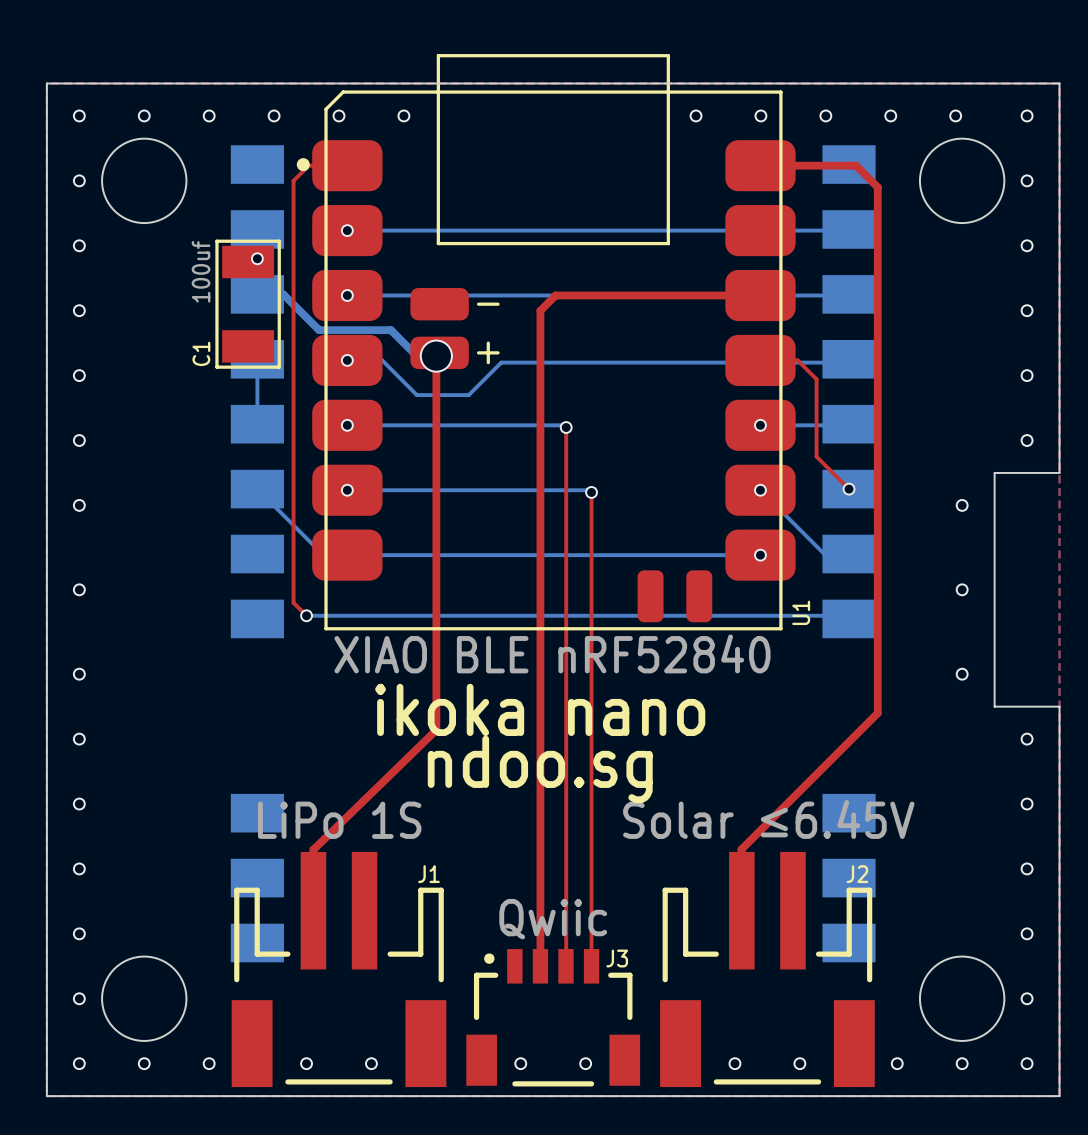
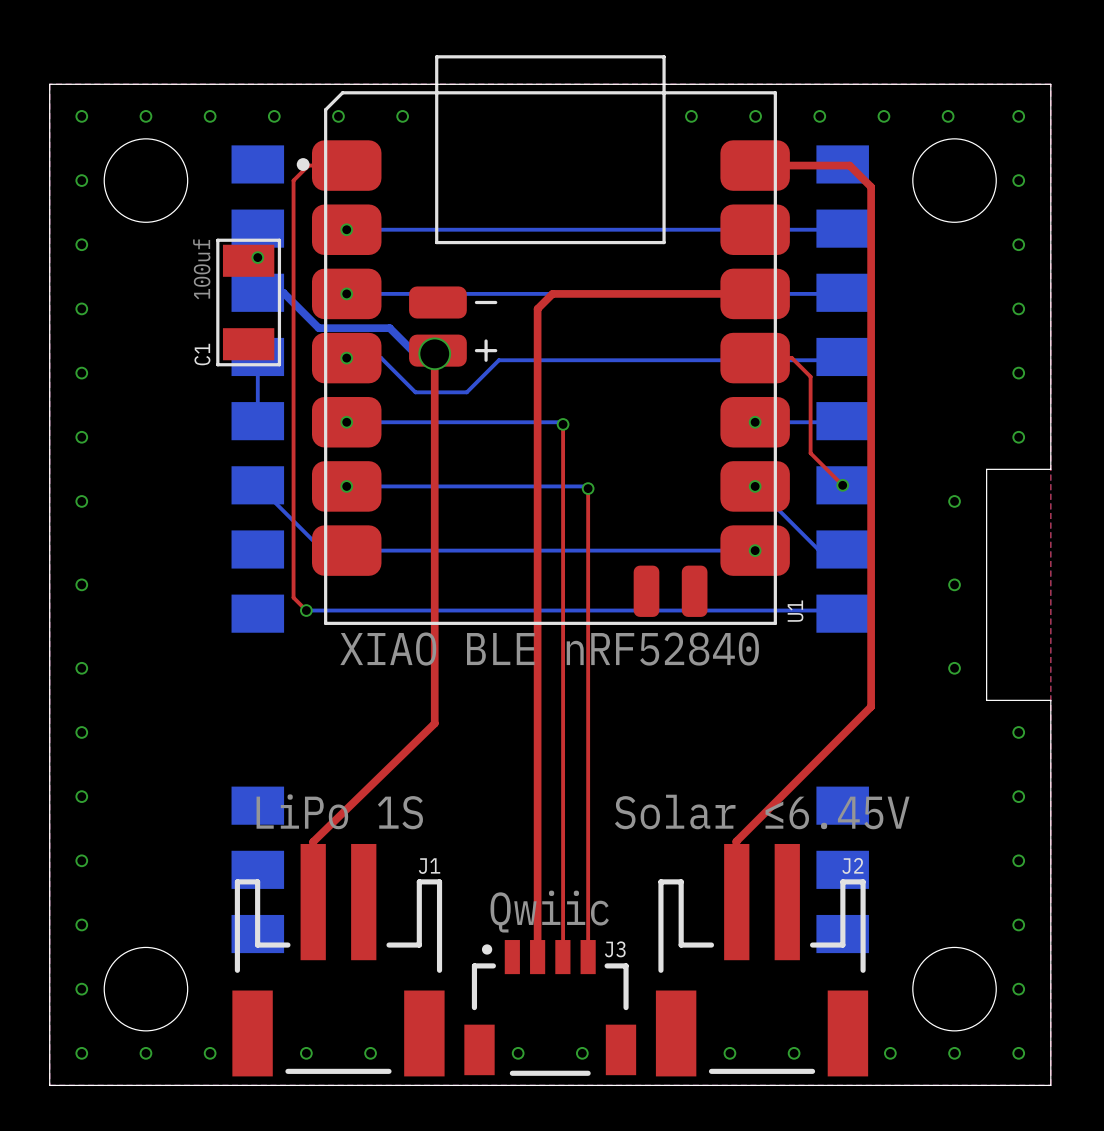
text: ikoka nano (540, 709) -> none
text: ndoo.sg (540, 769) -> none

